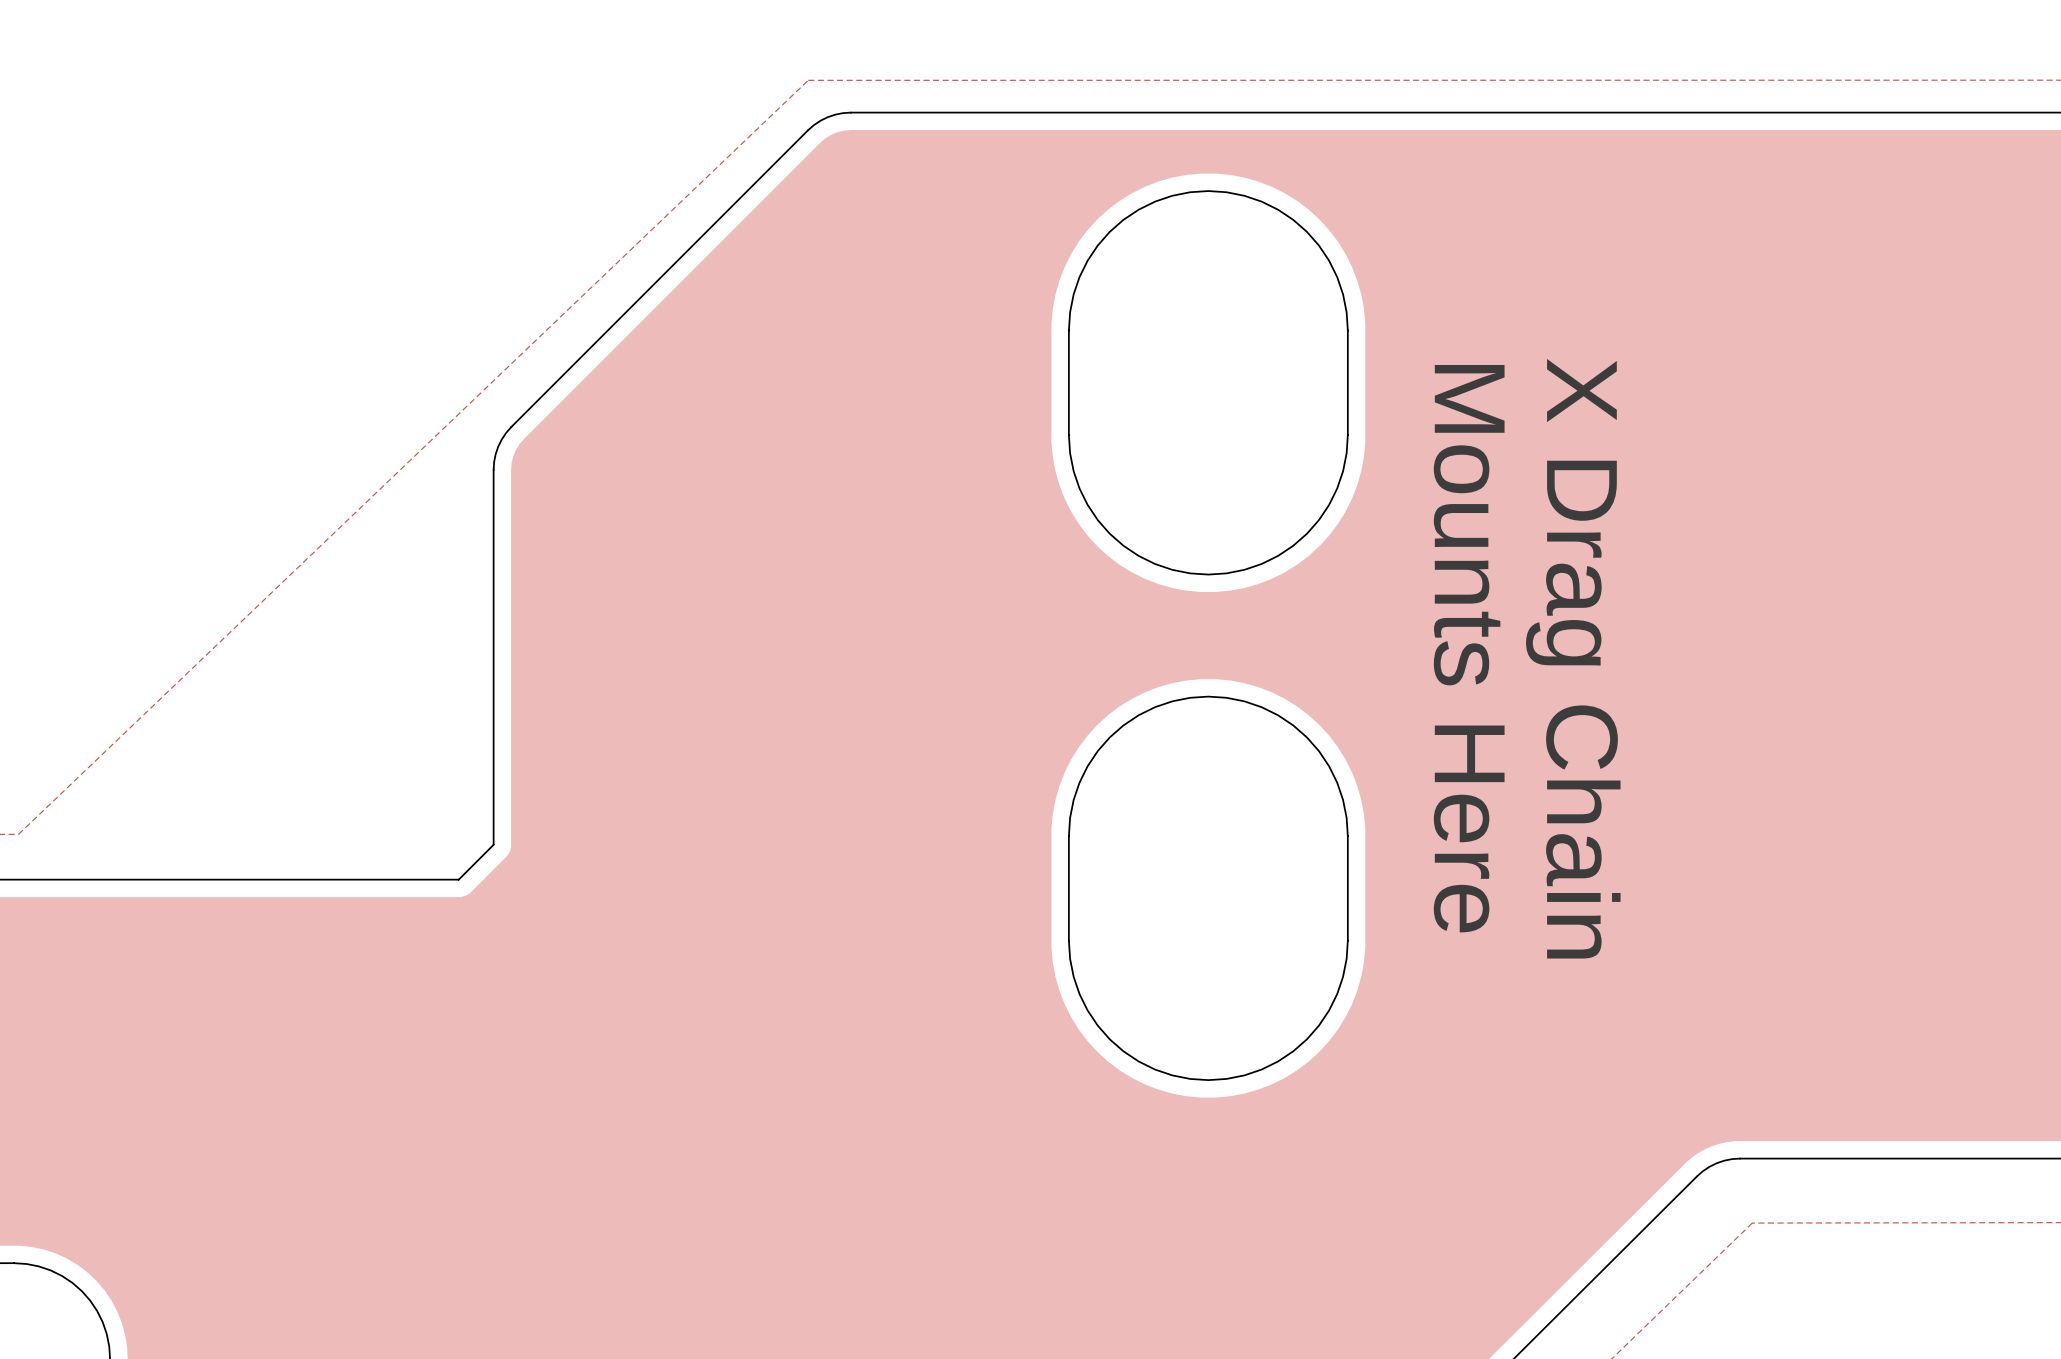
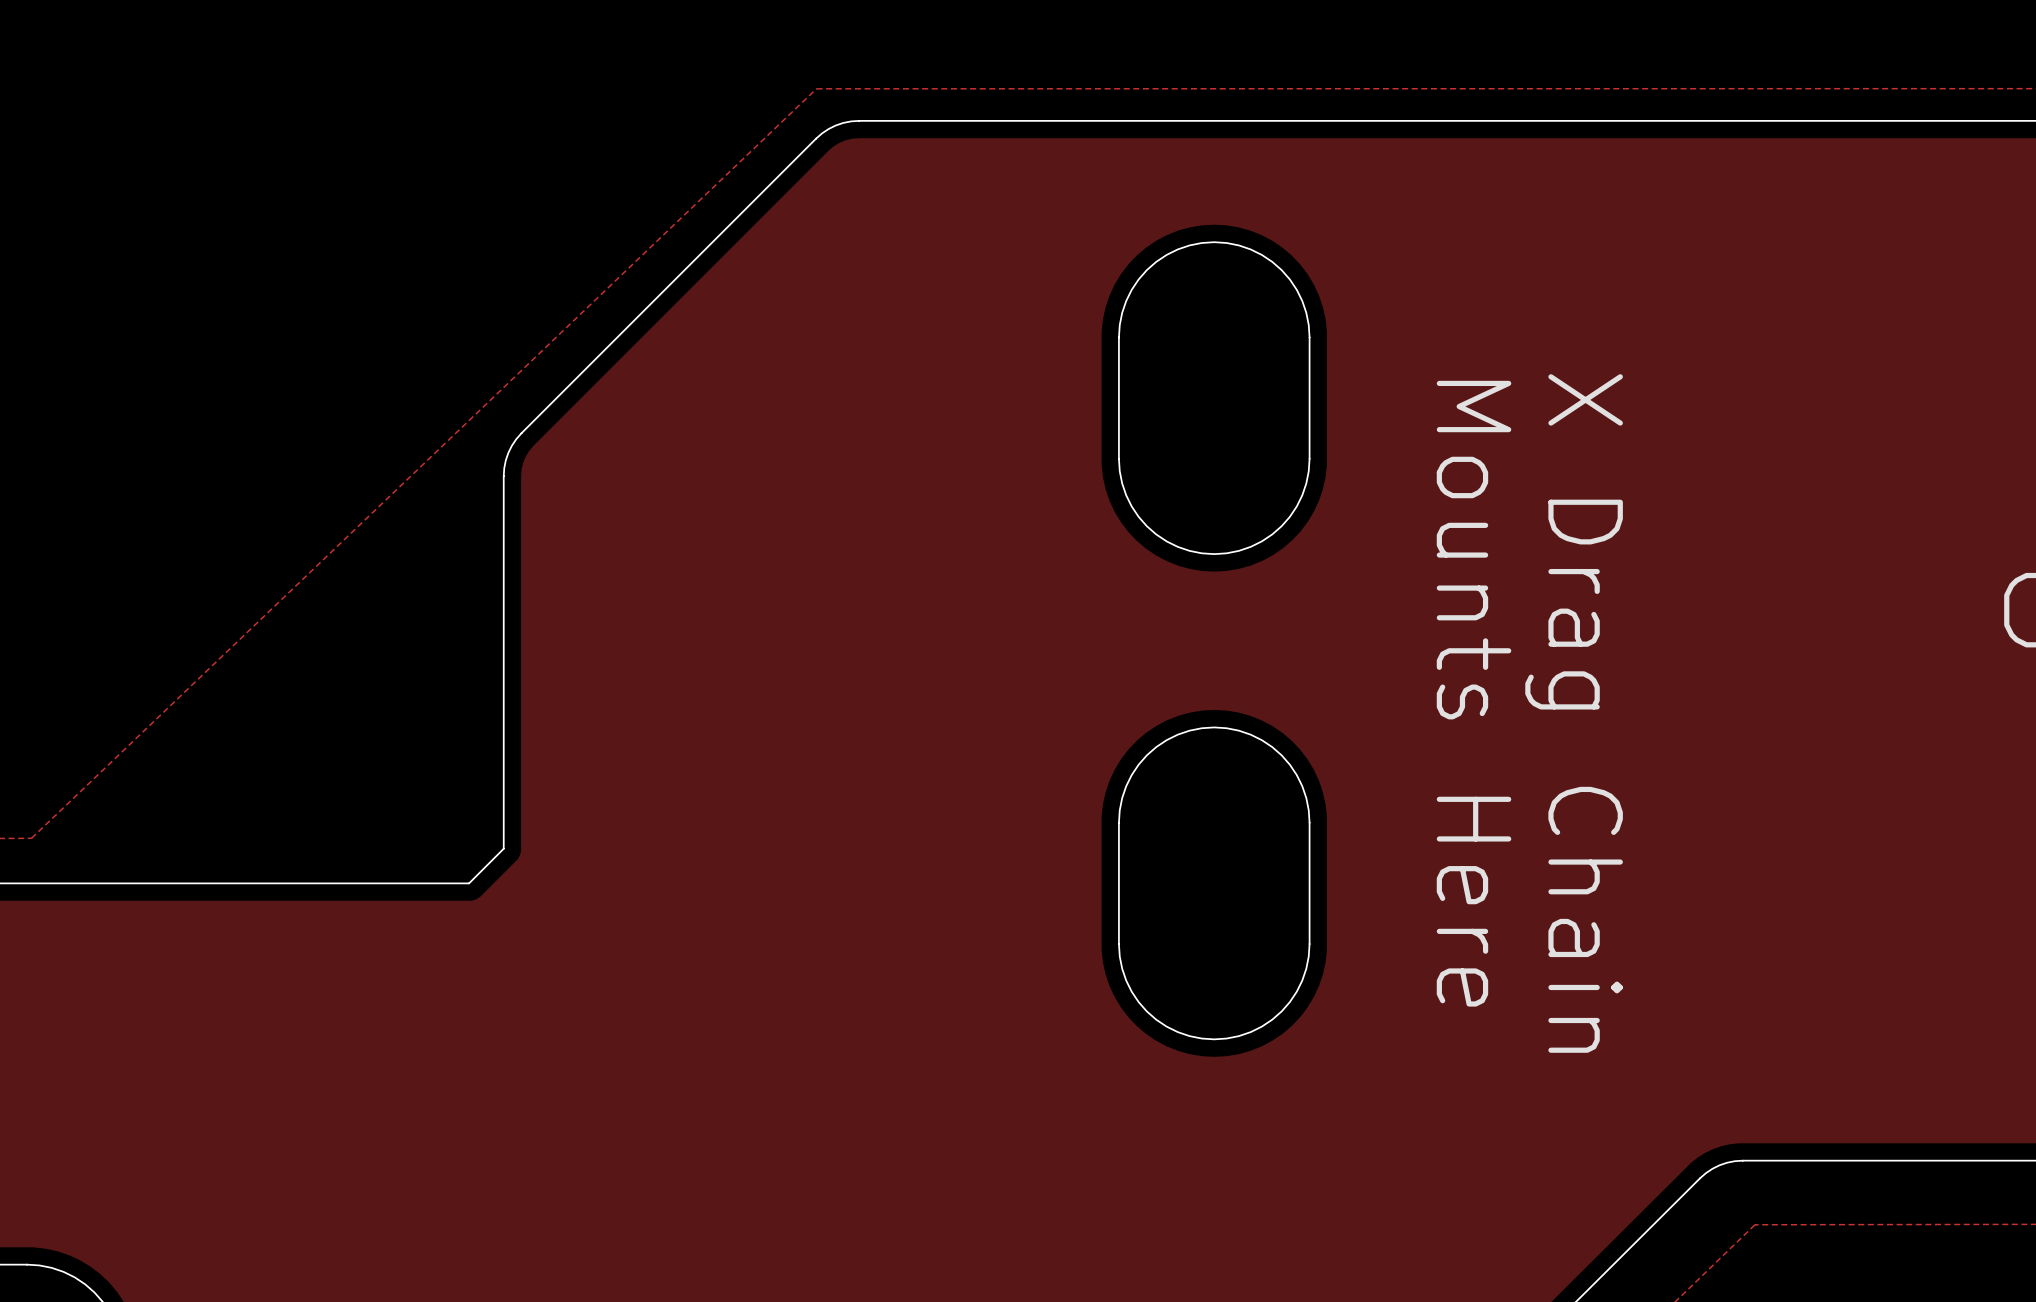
board edge: (1068, 330) (1068, 435) (1073, 471) (1087, 504) (1097, 520) (1123, 545) (1155, 563) (1172, 569) (1208, 574) (1226, 573) (1244, 569) (1278, 555) (1306, 533) (1319, 520) (1337, 488) (1346, 453) (1346, 312) (1337, 277) (1329, 260) (1306, 231) (1293, 219) (1261, 201) (1226, 192) (1190, 192) (1155, 201) (1138, 209) (1109, 231) (1087, 260) (1073, 294) (1068, 330) -> (1118, 337) (1119, 471) (1126, 495) (1138, 516) (1146, 526) (1166, 541) (1189, 550) (1201, 553) (1214, 554) (1238, 550) (1261, 541) (1272, 534) (1281, 526) (1296, 506) (1306, 483) (1308, 471) (1308, 325) (1302, 301) (1289, 279) (1281, 270) (1261, 254) (1238, 245) (1214, 242) (1189, 245) (1166, 254) (1146, 270) (1138, 279) (1126, 301) (1119, 325) (1118, 337)
board edge: (1068, 836) (1068, 940) (1073, 976) (1087, 1010) (1109, 1039) (1123, 1051) (1138, 1061) (1172, 1075) (1208, 1080) (1226, 1078) (1244, 1075) (1278, 1061) (1306, 1039) (1319, 1025) (1337, 994) (1346, 958) (1346, 817) (1337, 782) (1329, 766) (1306, 737) (1293, 725) (1261, 707) (1226, 697) (1190, 697) (1155, 707) (1123, 725) (1109, 737) (1087, 766) (1073, 799) (1068, 836) -> (1118, 822) (1119, 956) (1126, 980) (1138, 1002) (1156, 1019) (1166, 1026) (1189, 1036) (1201, 1038) (1226, 1038) (1238, 1036) (1250, 1032) (1272, 1019) (1281, 1011) (1296, 991) (1306, 968) (1308, 956) (1308, 810) (1302, 786) (1289, 764) (1281, 755) (1261, 740) (1238, 730) (1214, 727) (1189, 730) (1177, 734) (1156, 747) (1138, 764) (1126, 786) (1119, 810) (1118, 822)

